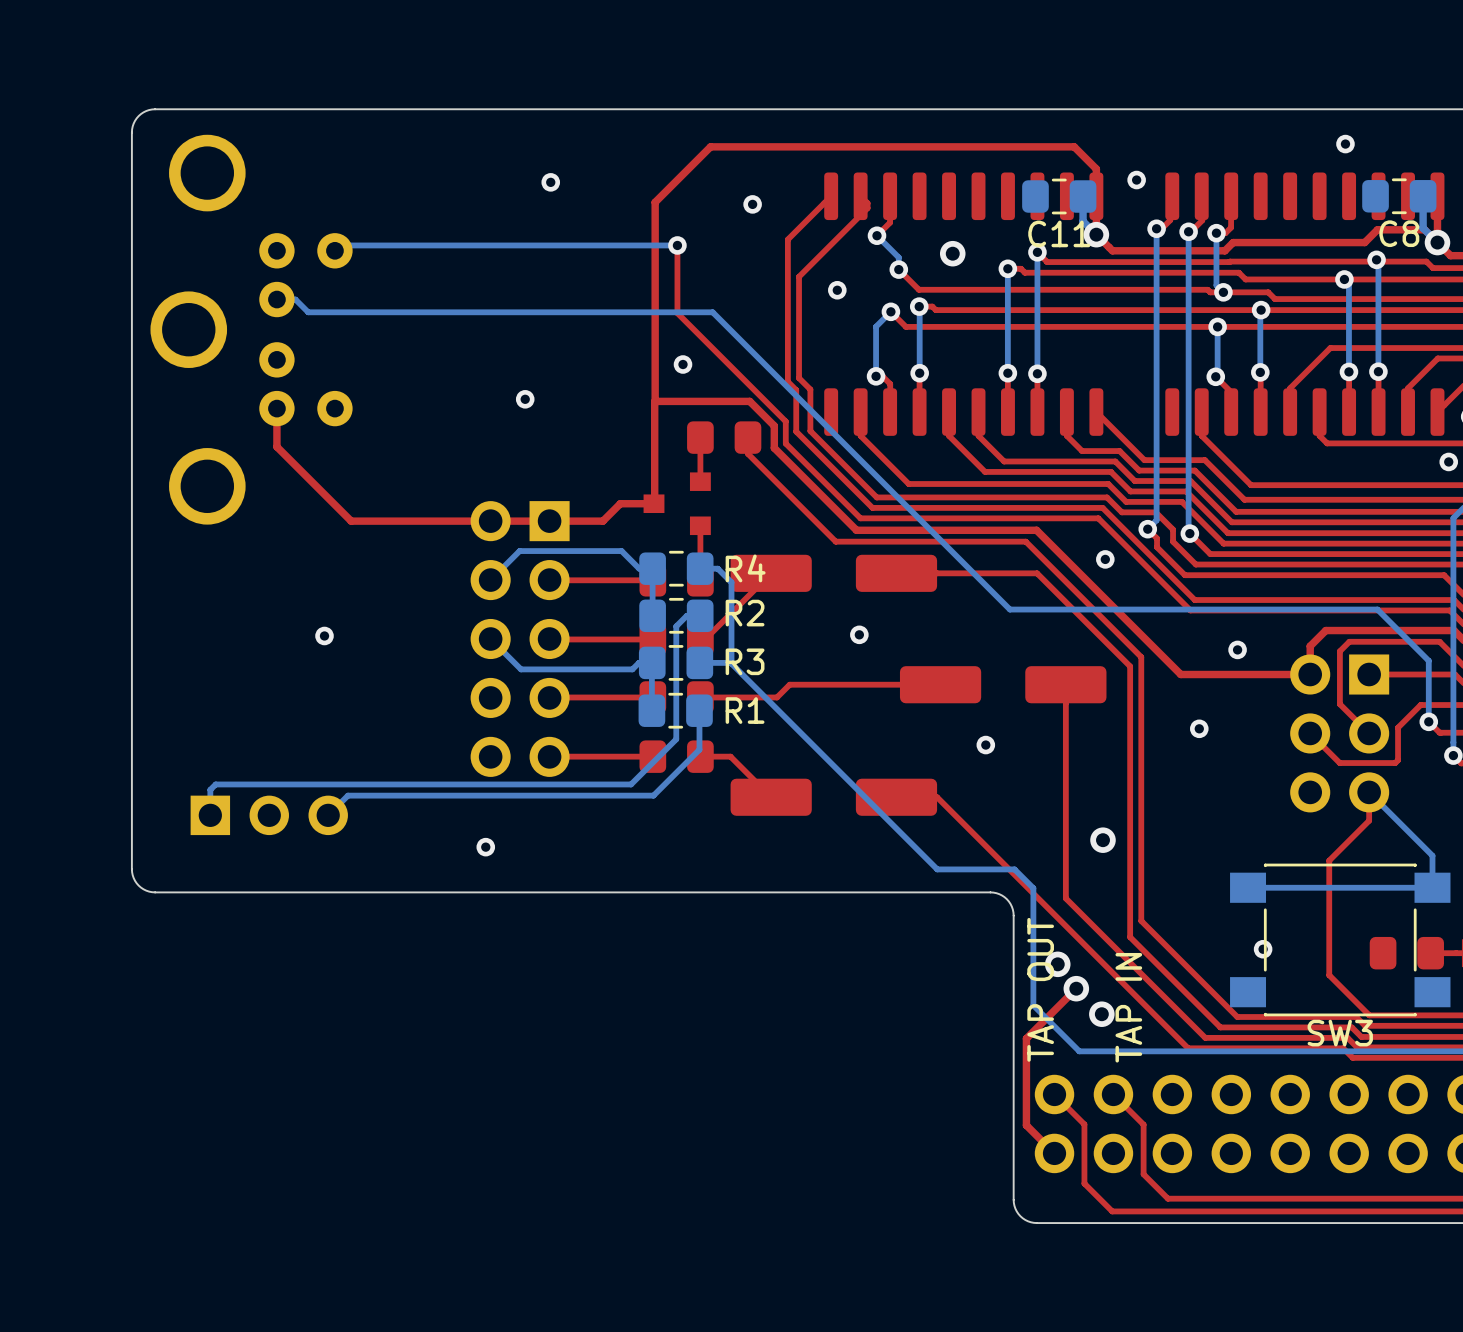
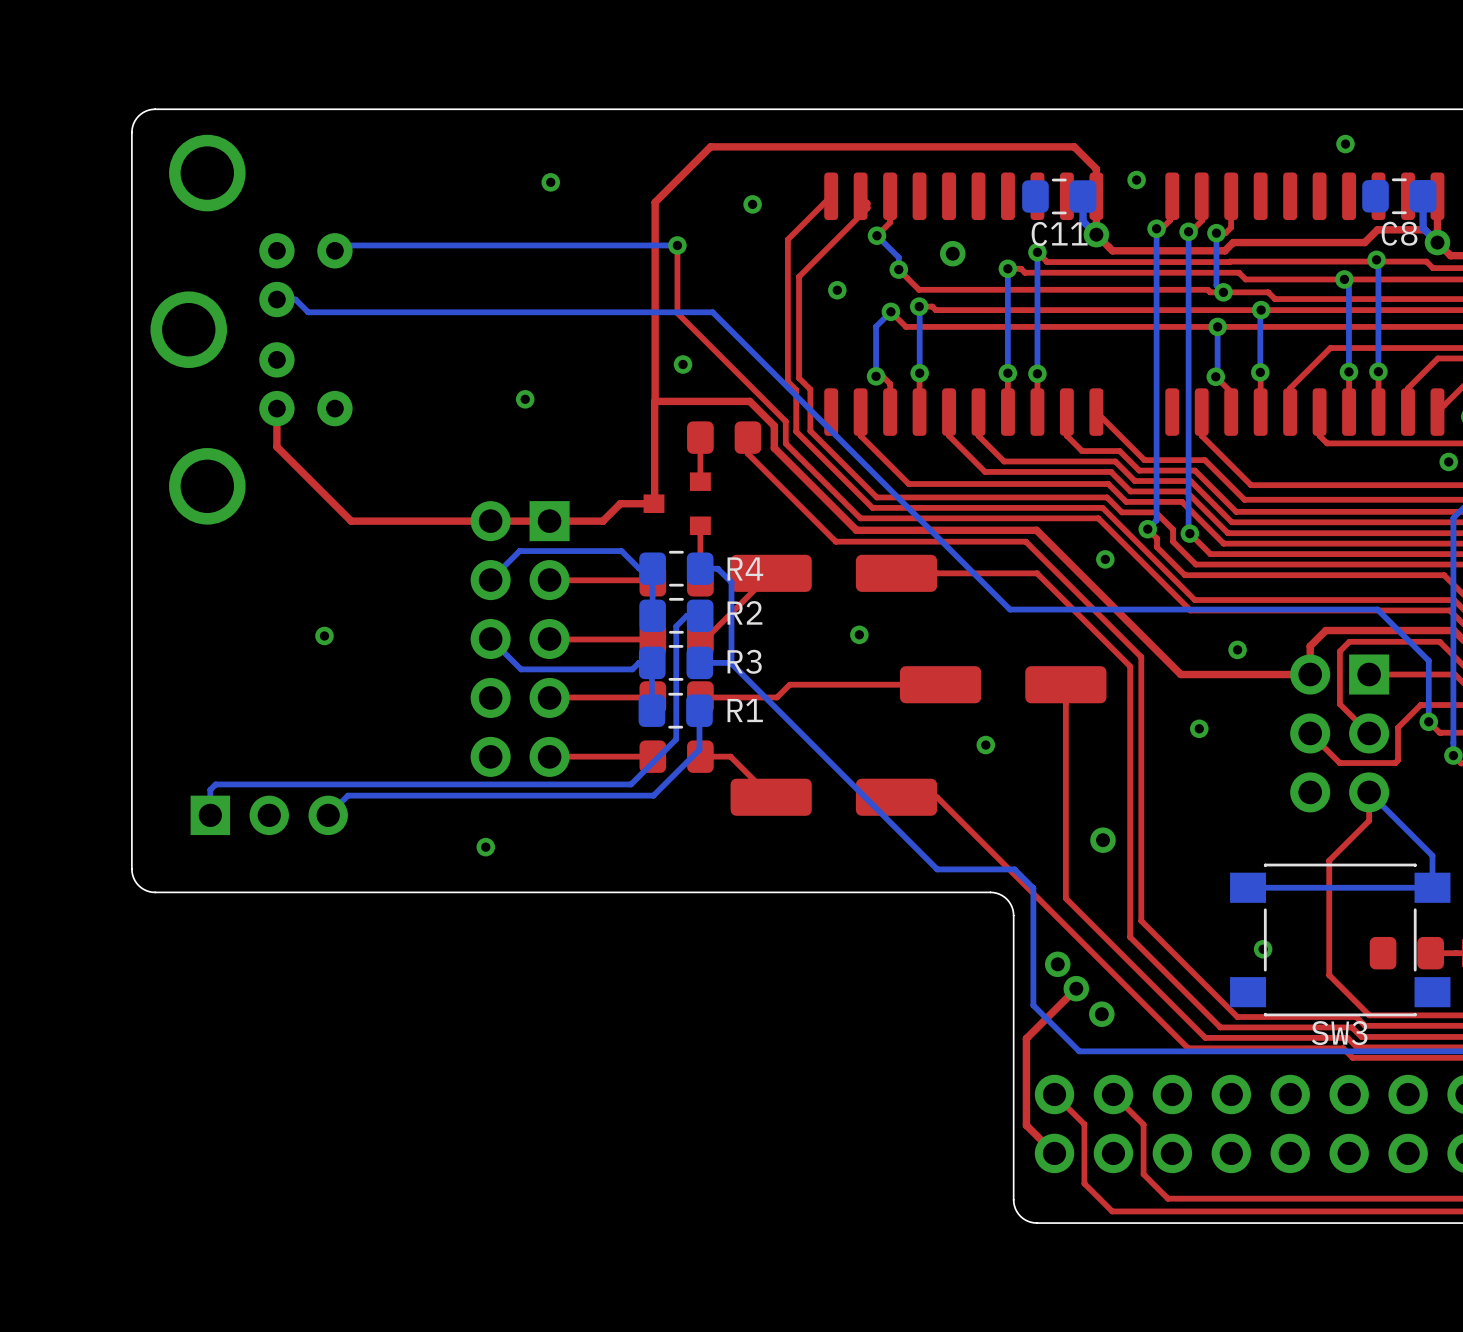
text: TAP OUT (1040, 989) -> none
text: TAP IN (1128, 1007) -> none

